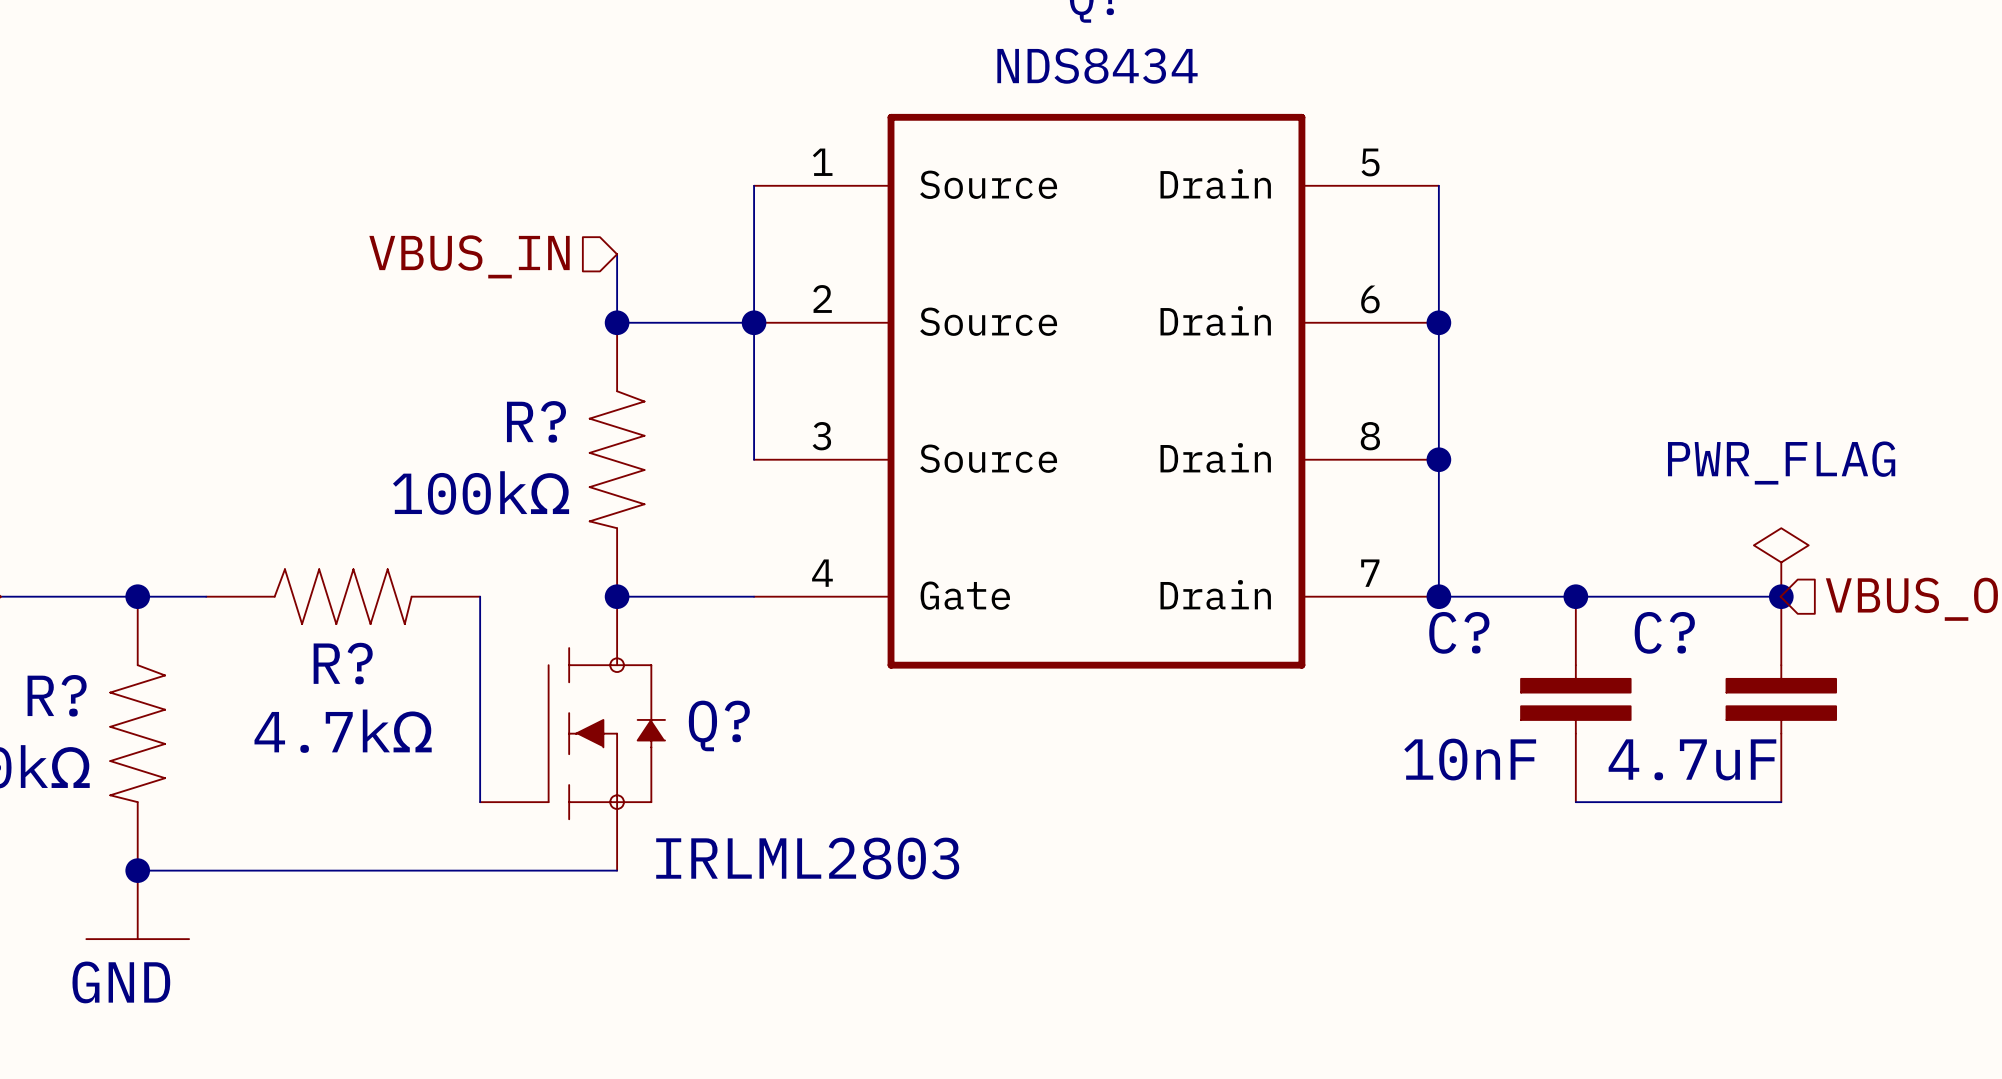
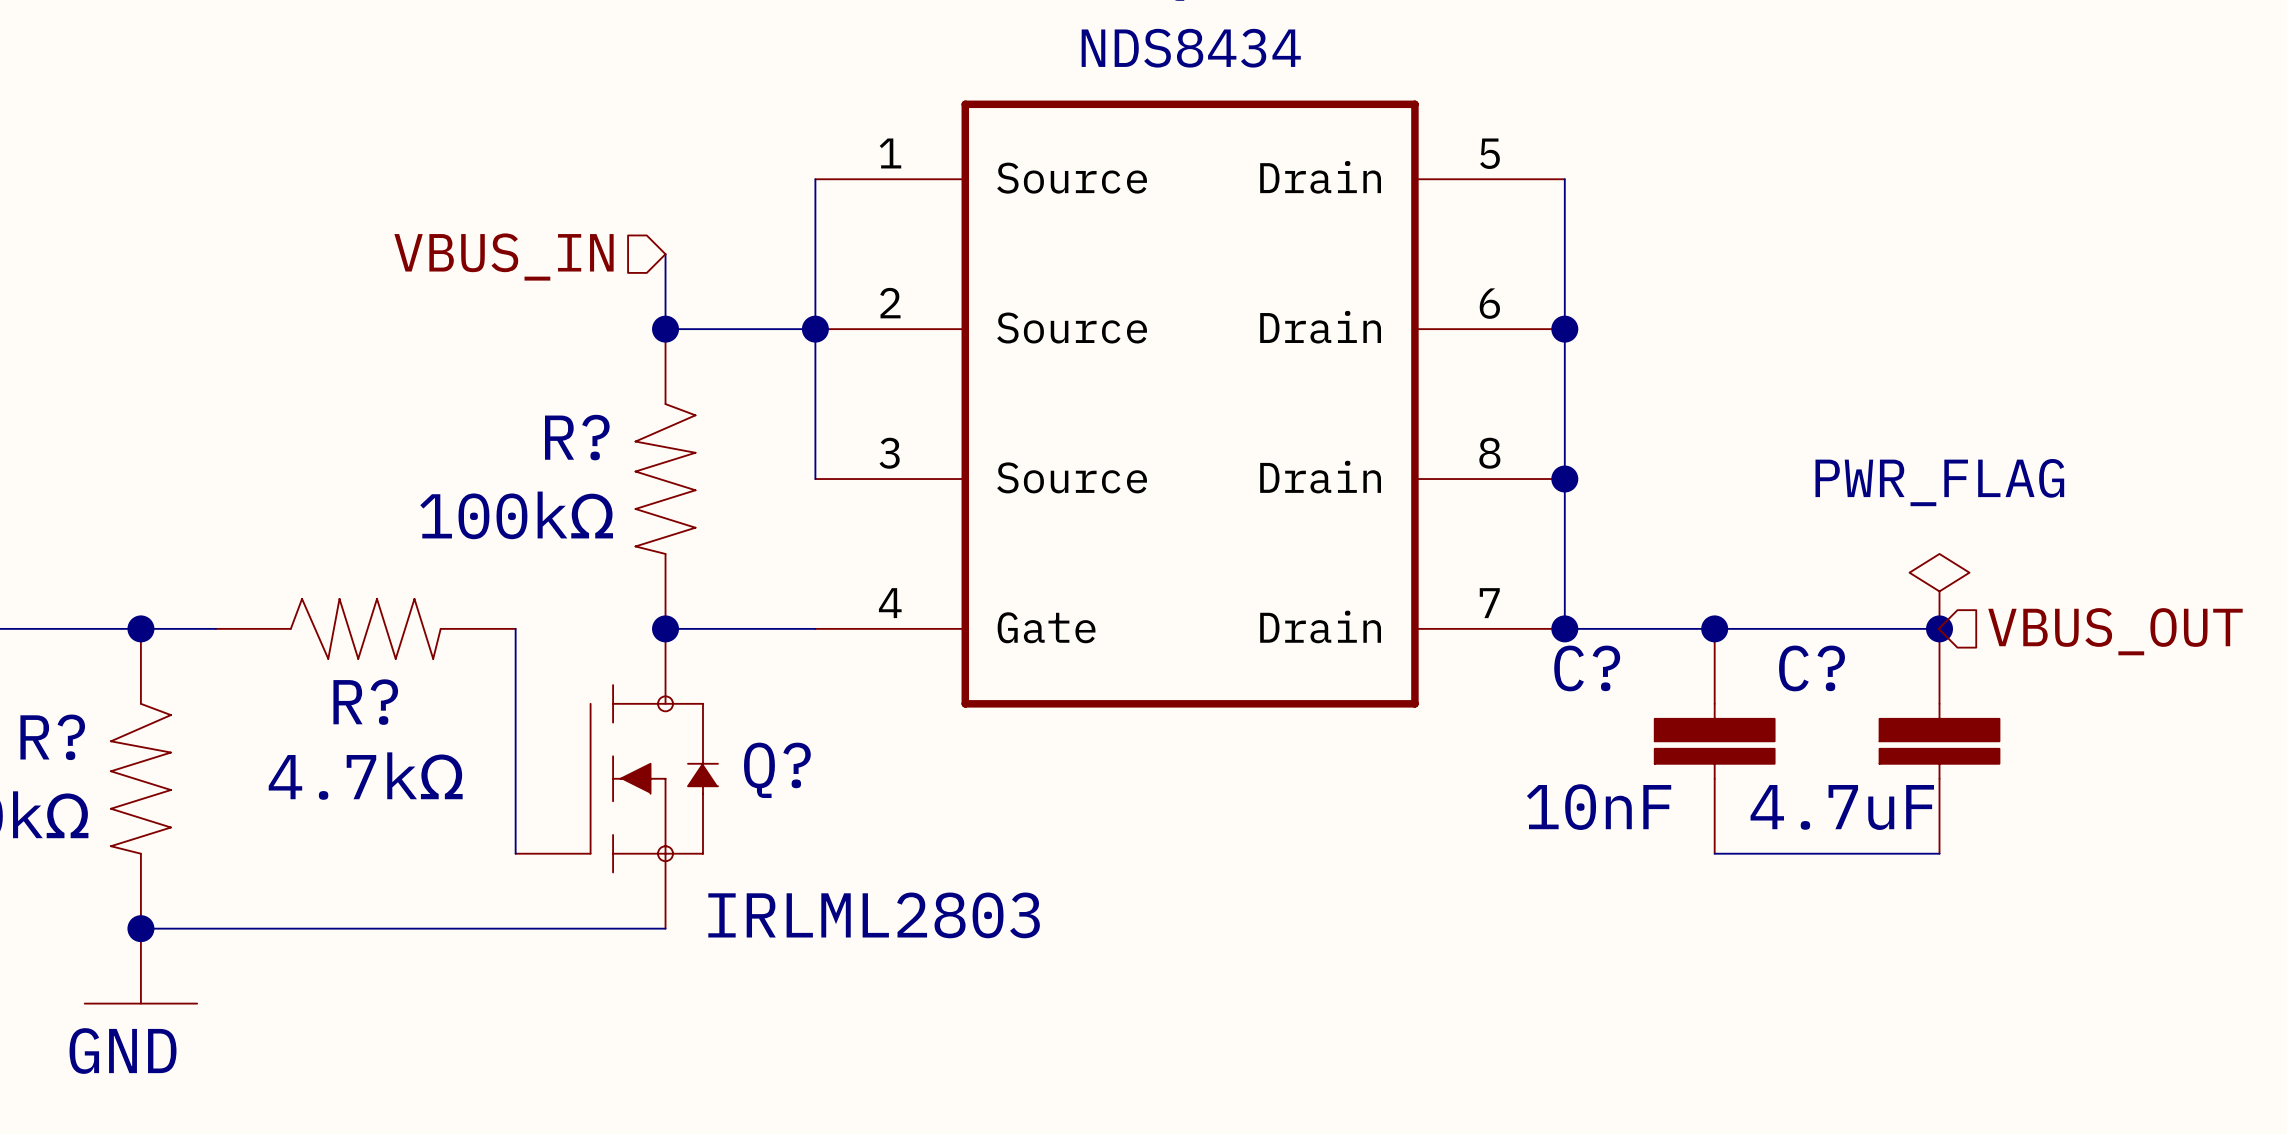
R? symbol: [589, 322, 645, 597] -> [635, 329, 696, 629]
R? symbol: [206, 569, 481, 625] -> [215, 598, 516, 659]
R? symbol: [110, 596, 166, 871] -> [110, 628, 171, 929]
C? symbol: [1521, 596, 1631, 803] -> [1654, 628, 1775, 854]
C? symbol: [1726, 596, 1837, 803] -> [1879, 628, 2000, 854]

